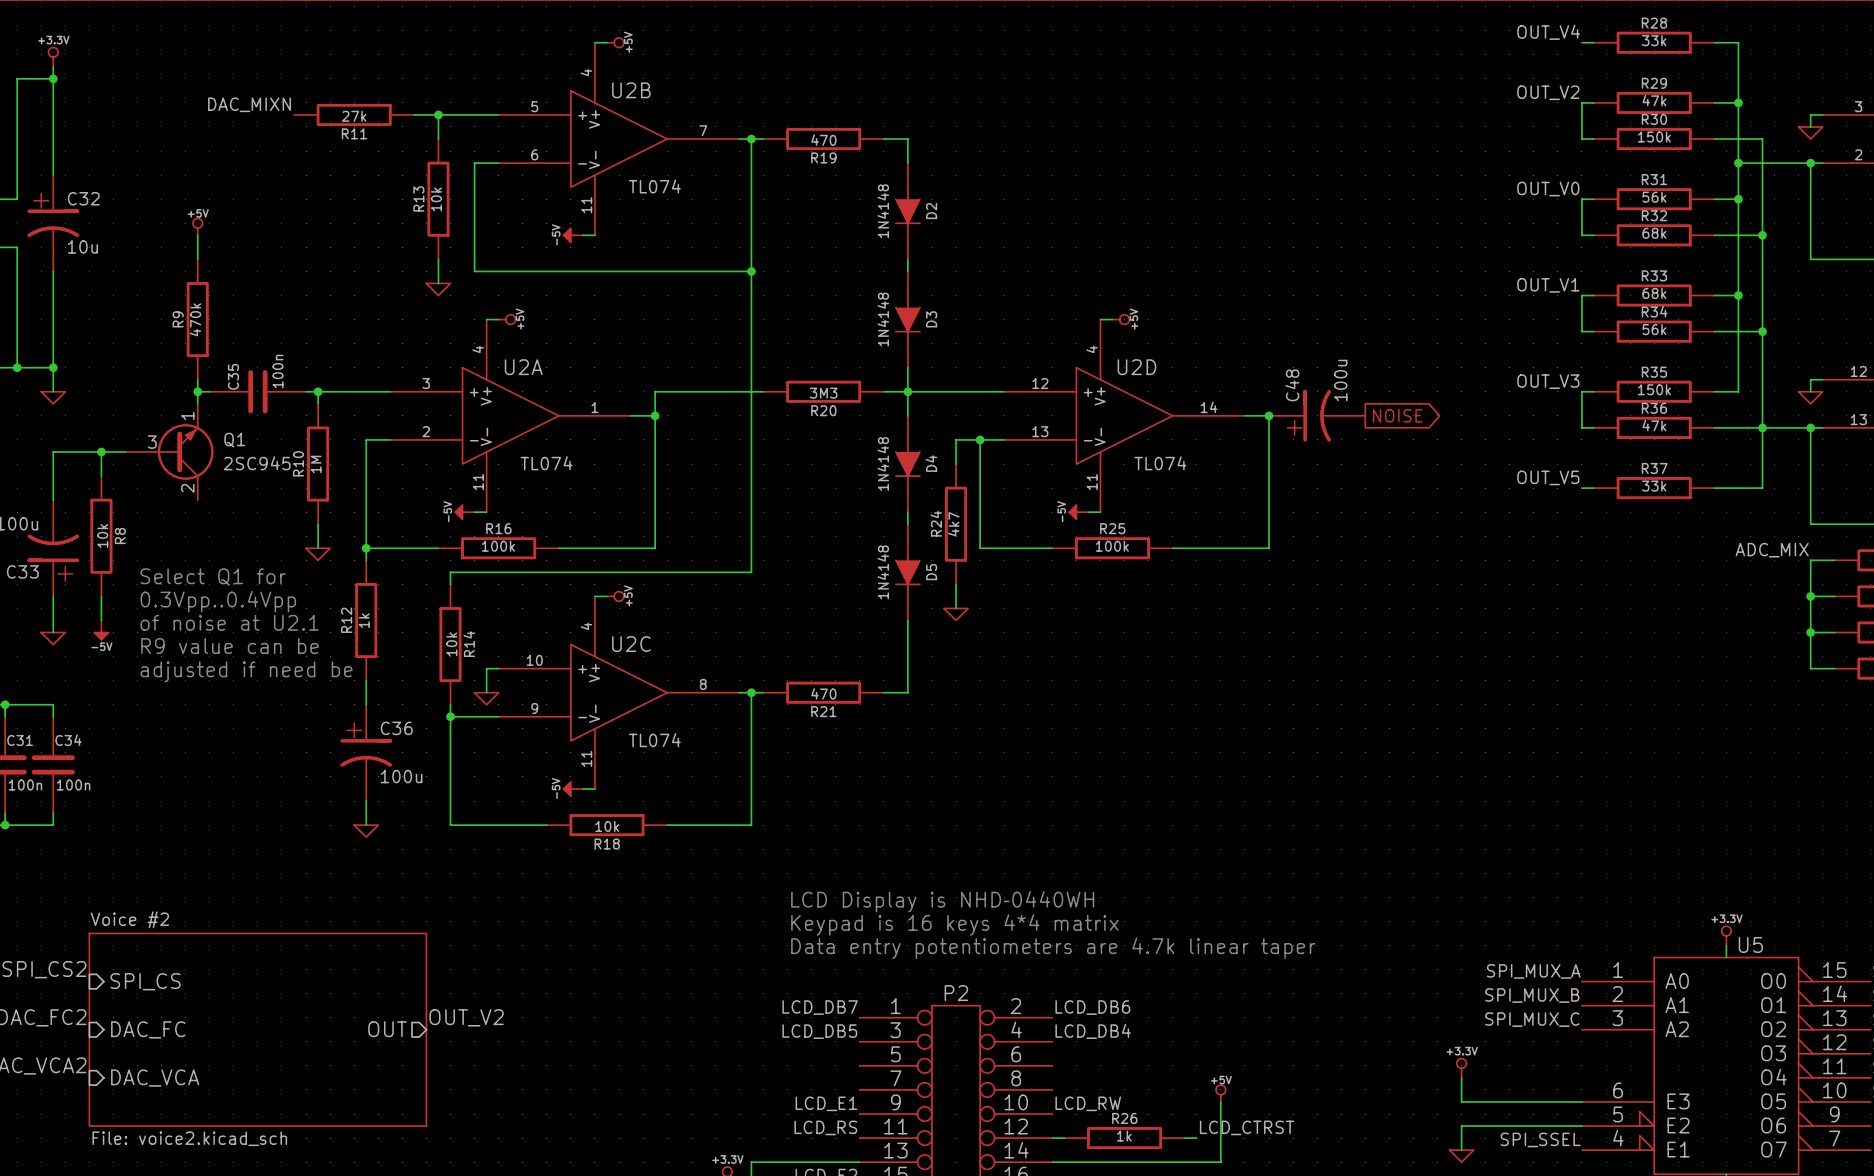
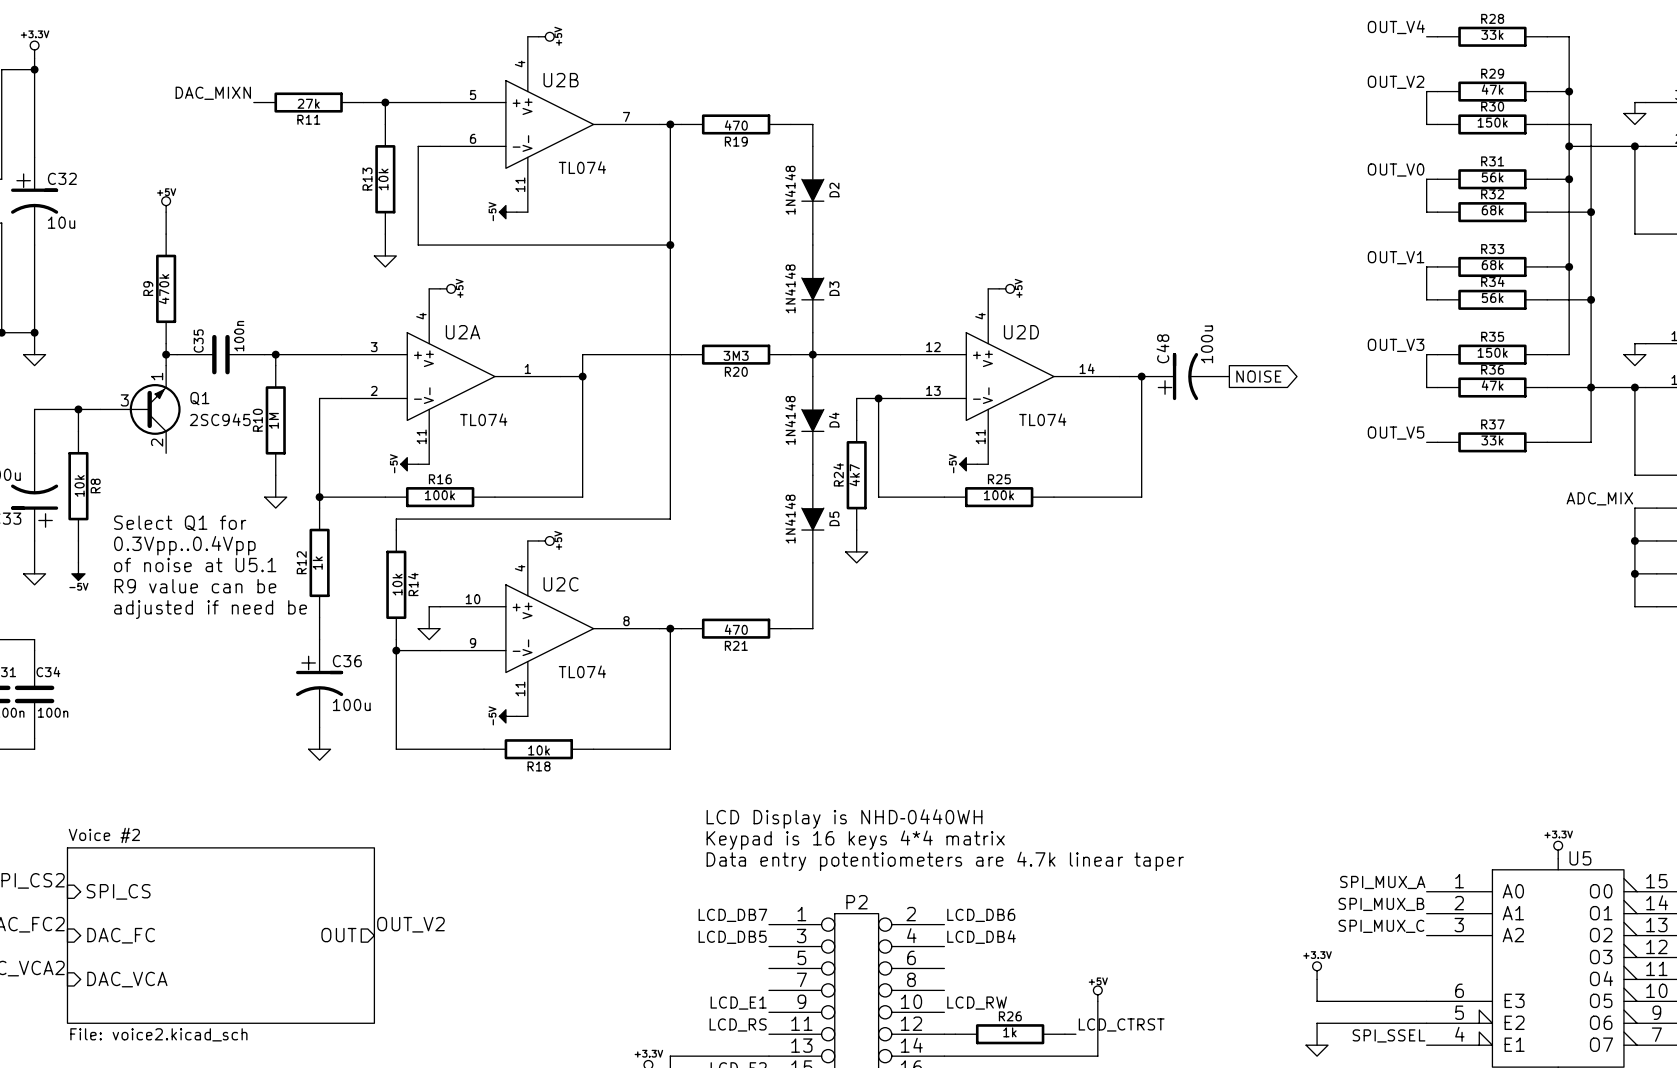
text: of noise at U2.1 (229, 622) -> of noise at U5.1 (195, 565)

